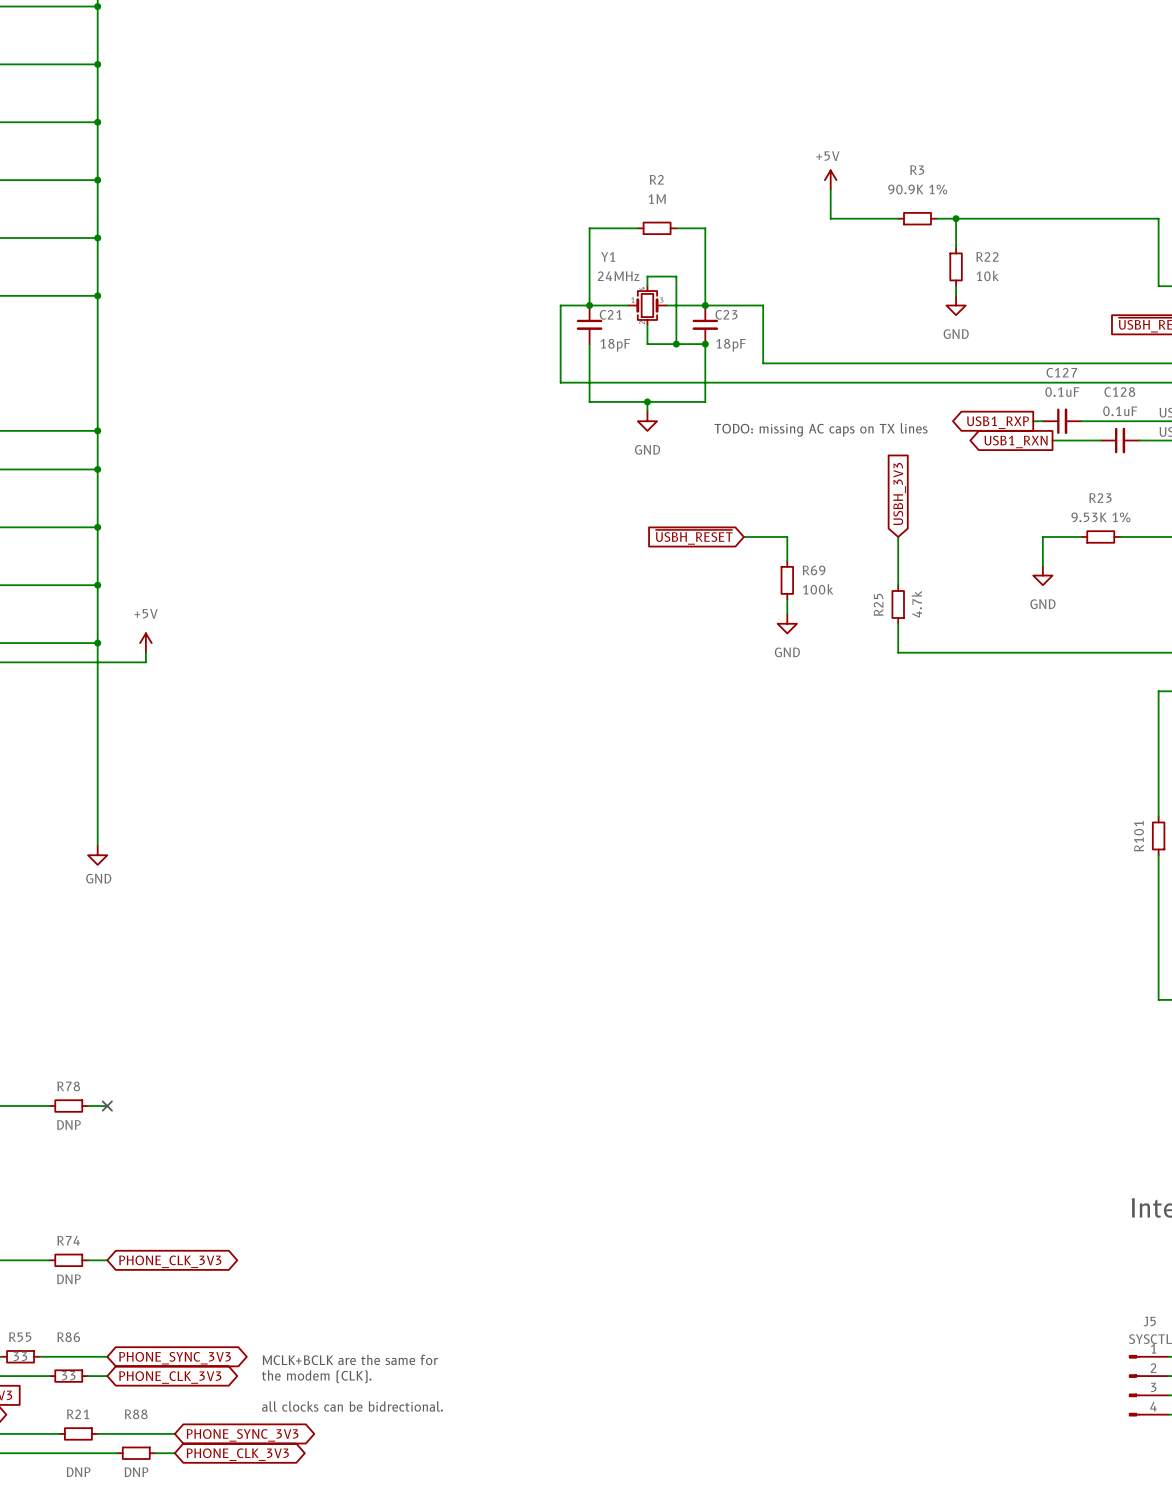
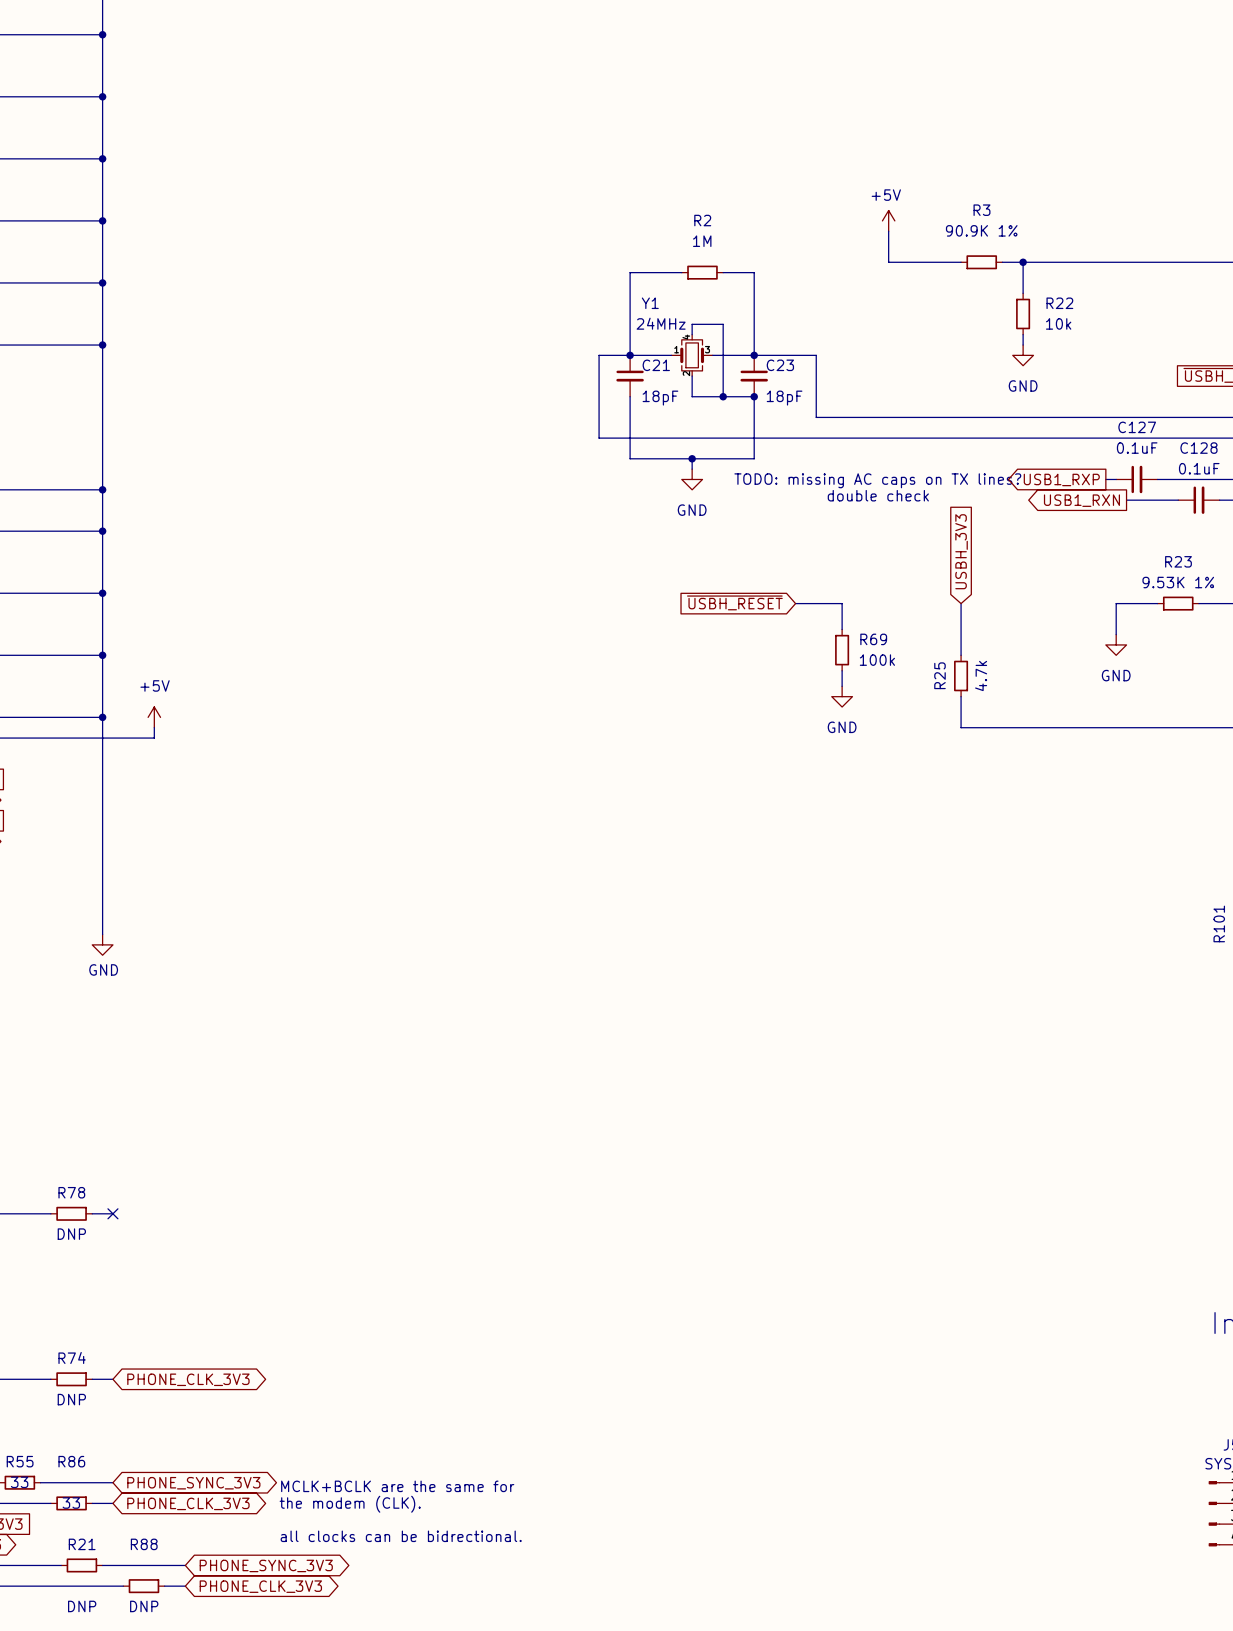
text: TODO: missing AC caps on TX lines (821, 429) -> TODO: missing AC caps on TX lines? (877, 480)
text: none -> double check (878, 495)

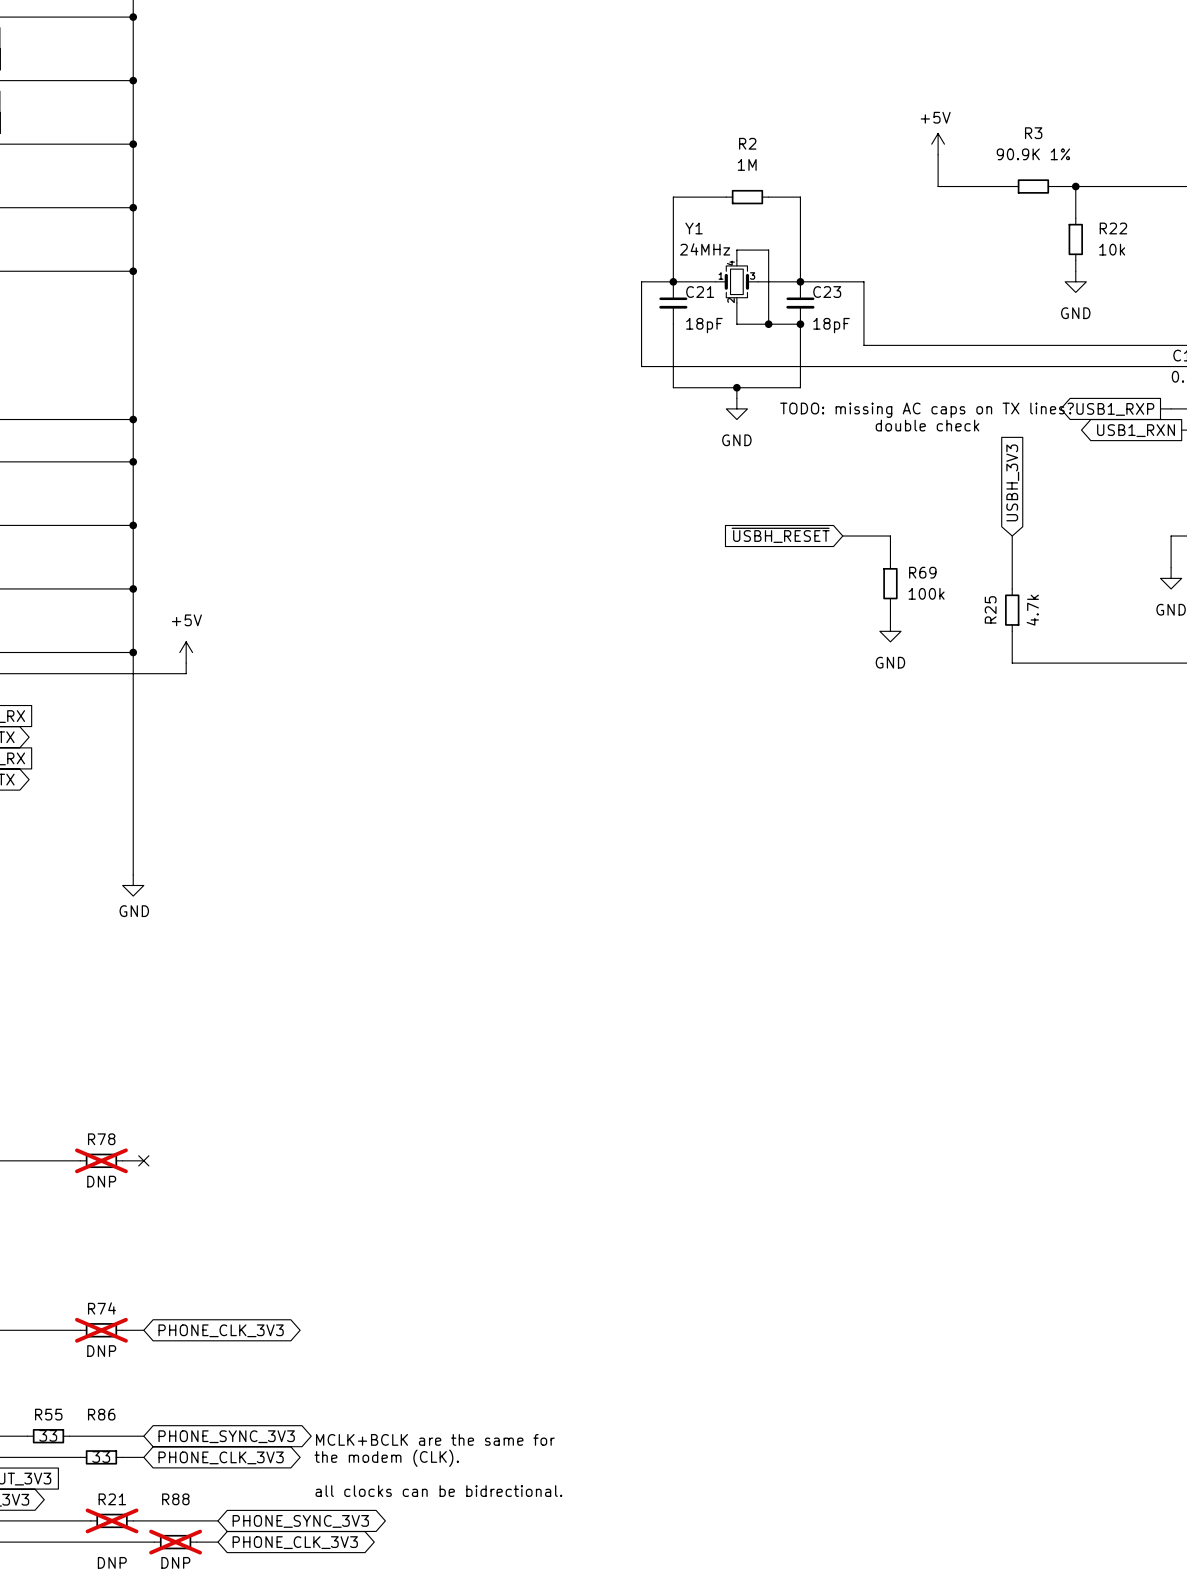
R78 do-not-place cross: none -> (101, 1160)
R74 do-not-place cross: none -> (101, 1330)
R21 do-not-place cross: none -> (112, 1520)
R88 do-not-place cross: none -> (175, 1542)

